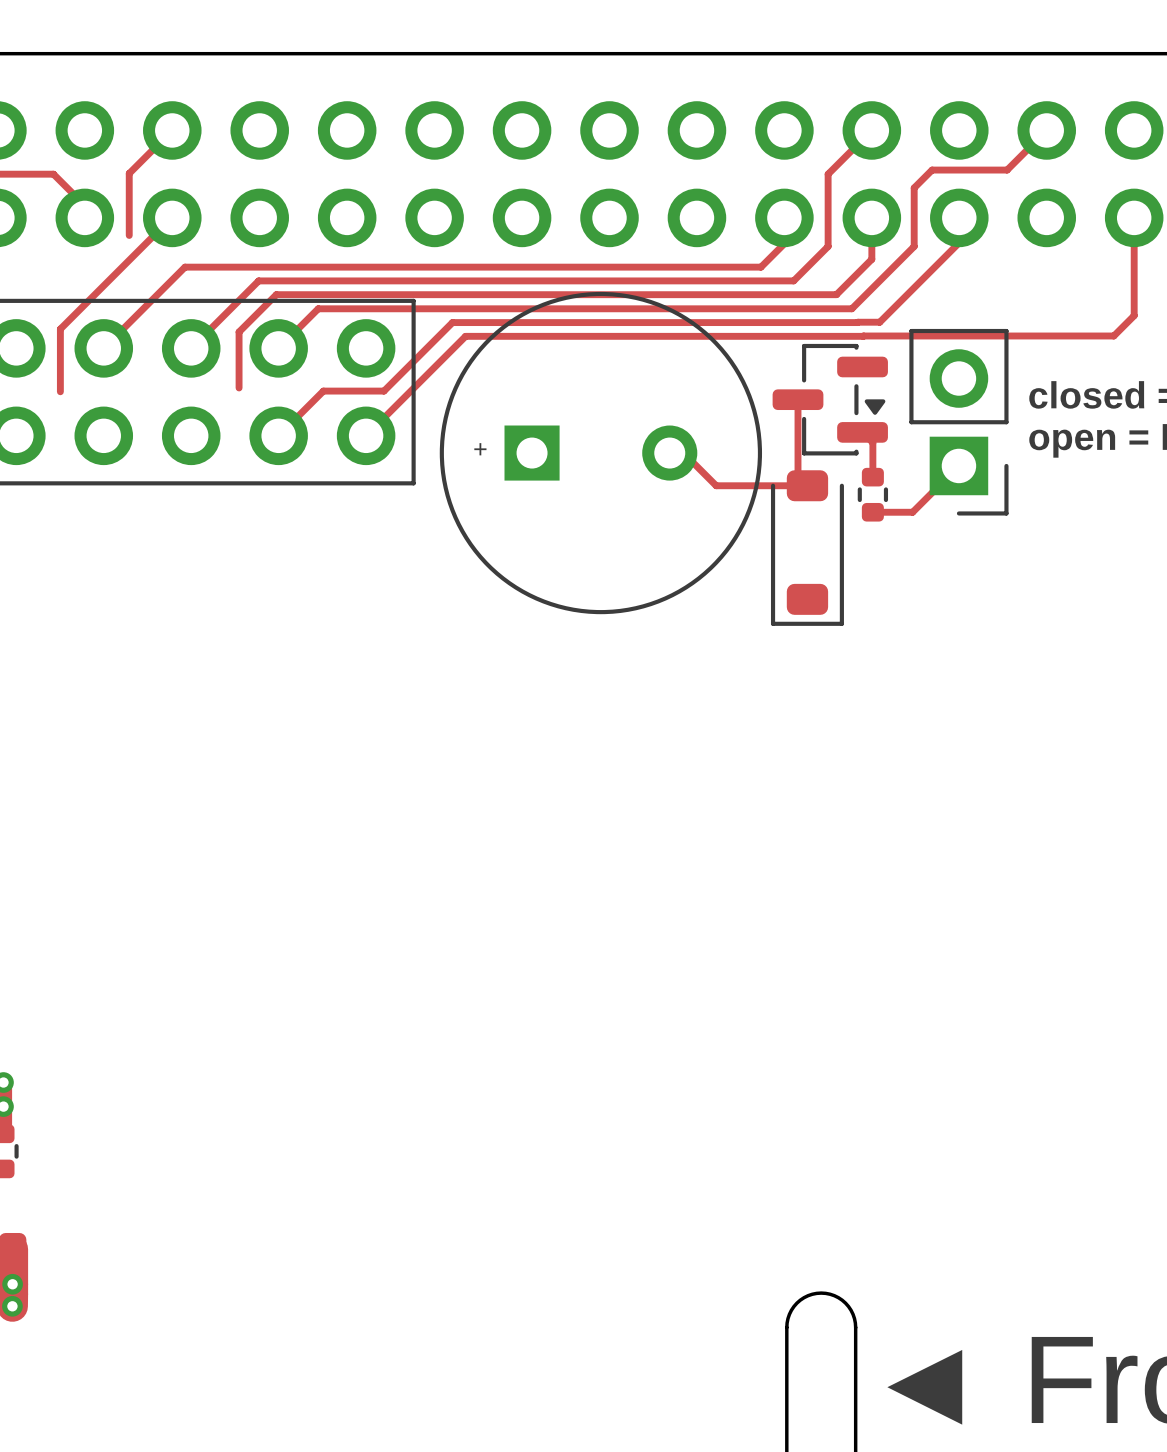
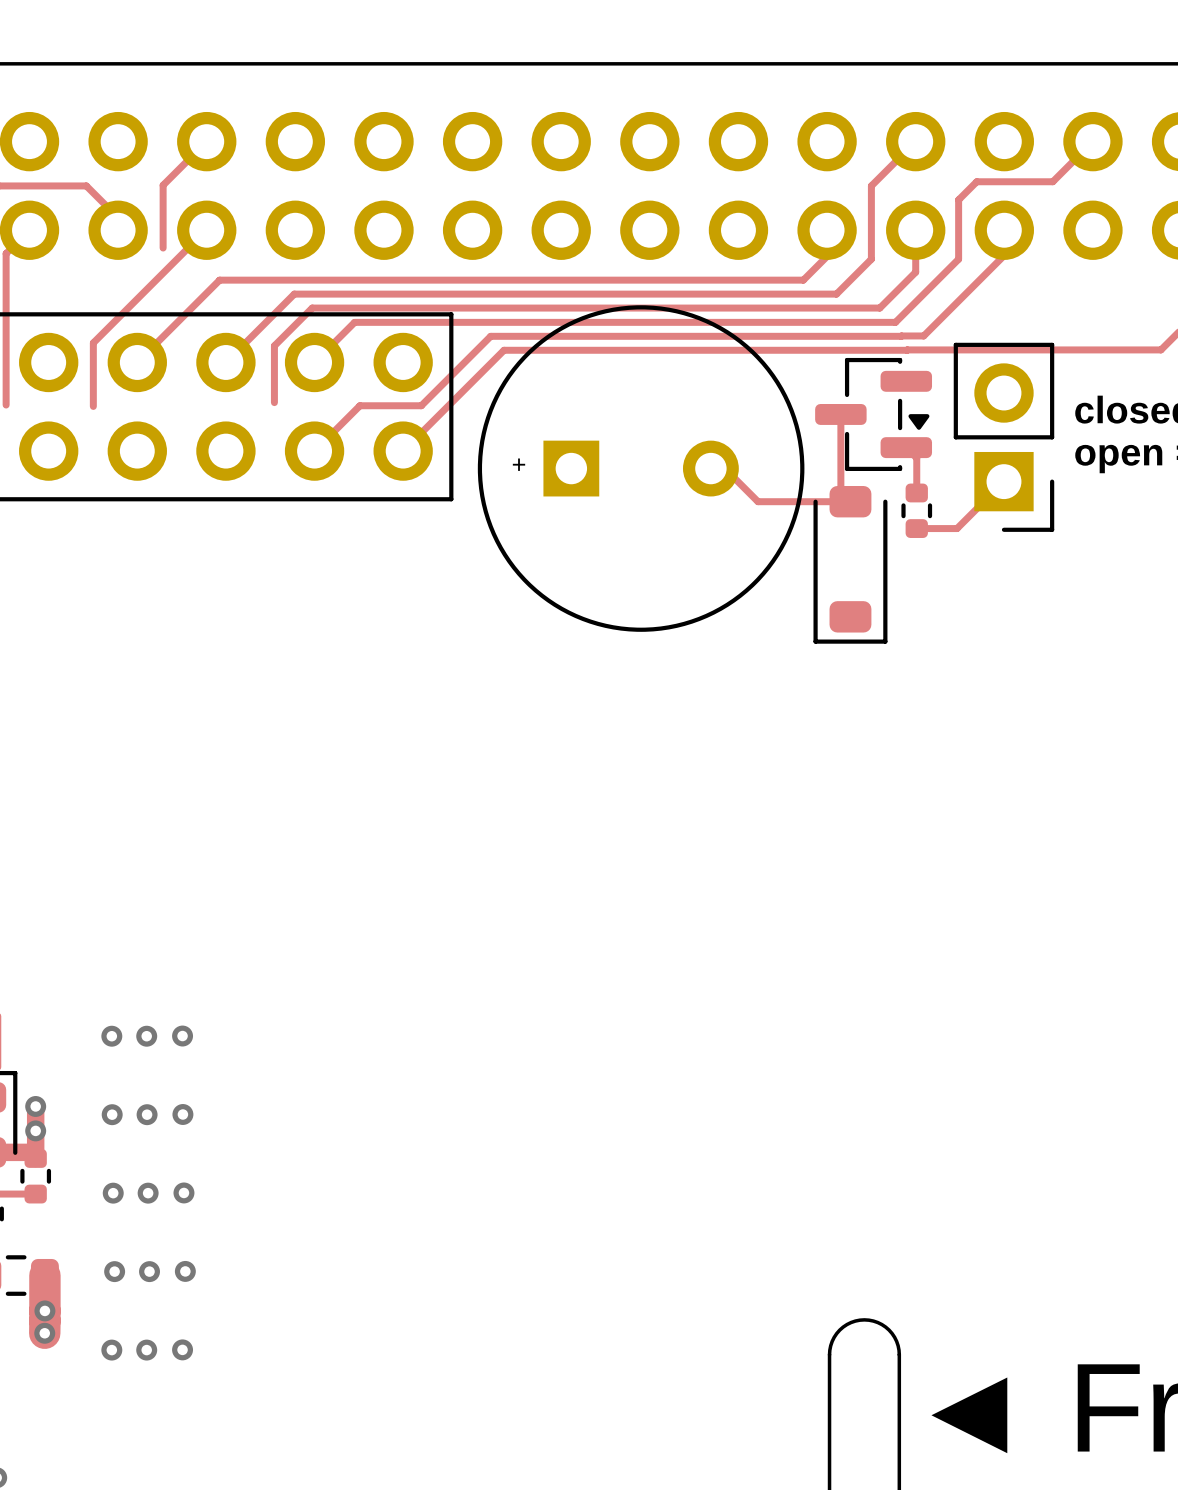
via: none -> (111, 1036)
via: none -> (146, 1036)
via: none -> (182, 1036)
via: none -> (112, 1114)
via: none -> (147, 1114)
via: none -> (182, 1114)
via: none -> (183, 1192)
via: none -> (113, 1193)
via: none -> (148, 1193)
via: none -> (114, 1271)
via: none -> (149, 1271)
via: none -> (185, 1271)
via: none -> (111, 1350)
via: none -> (146, 1350)
via: none -> (182, 1349)

